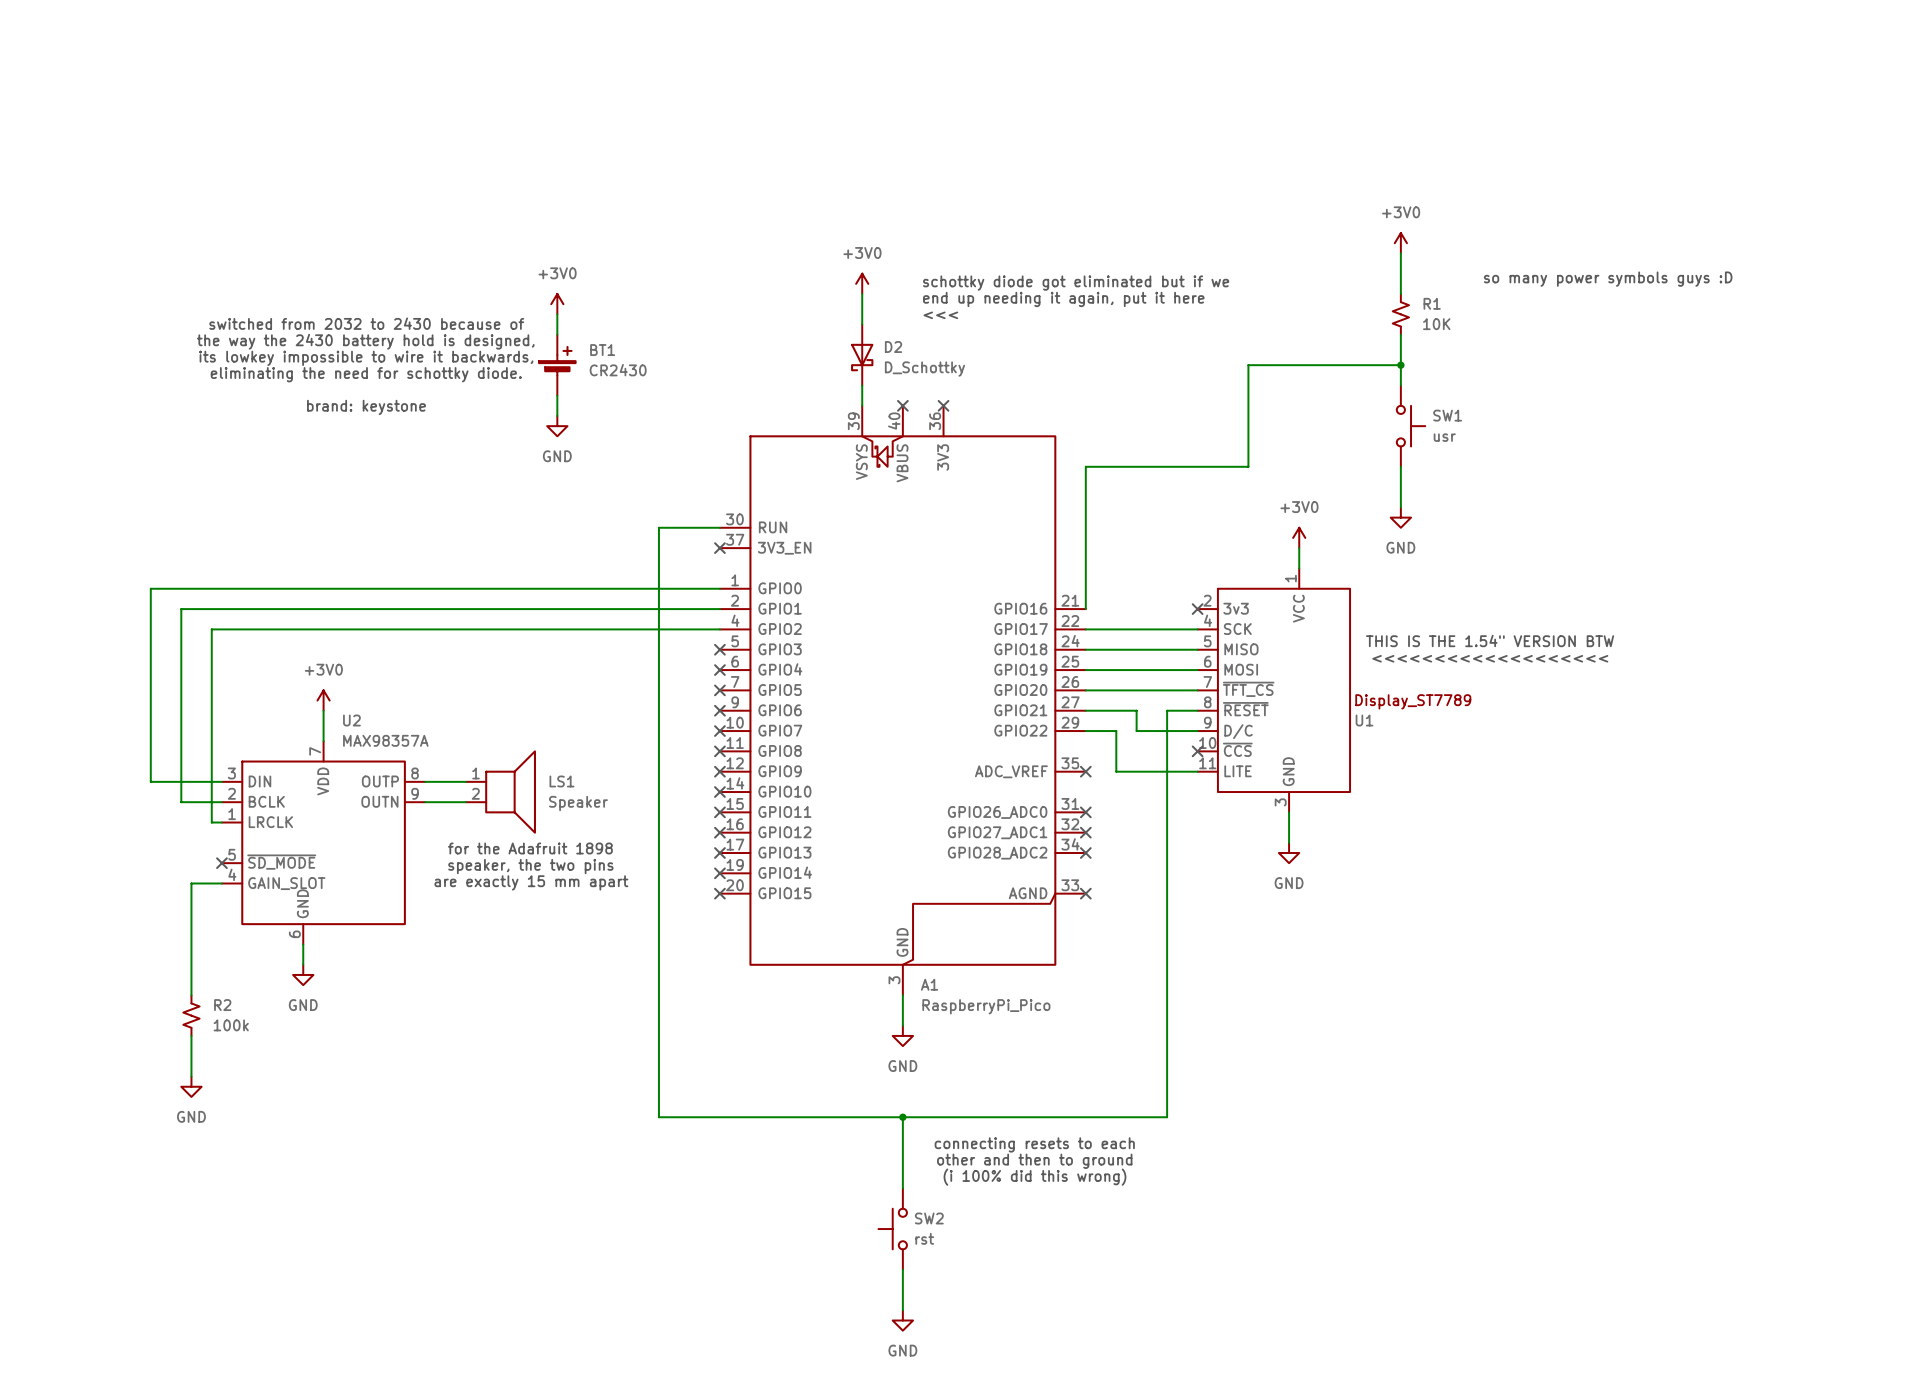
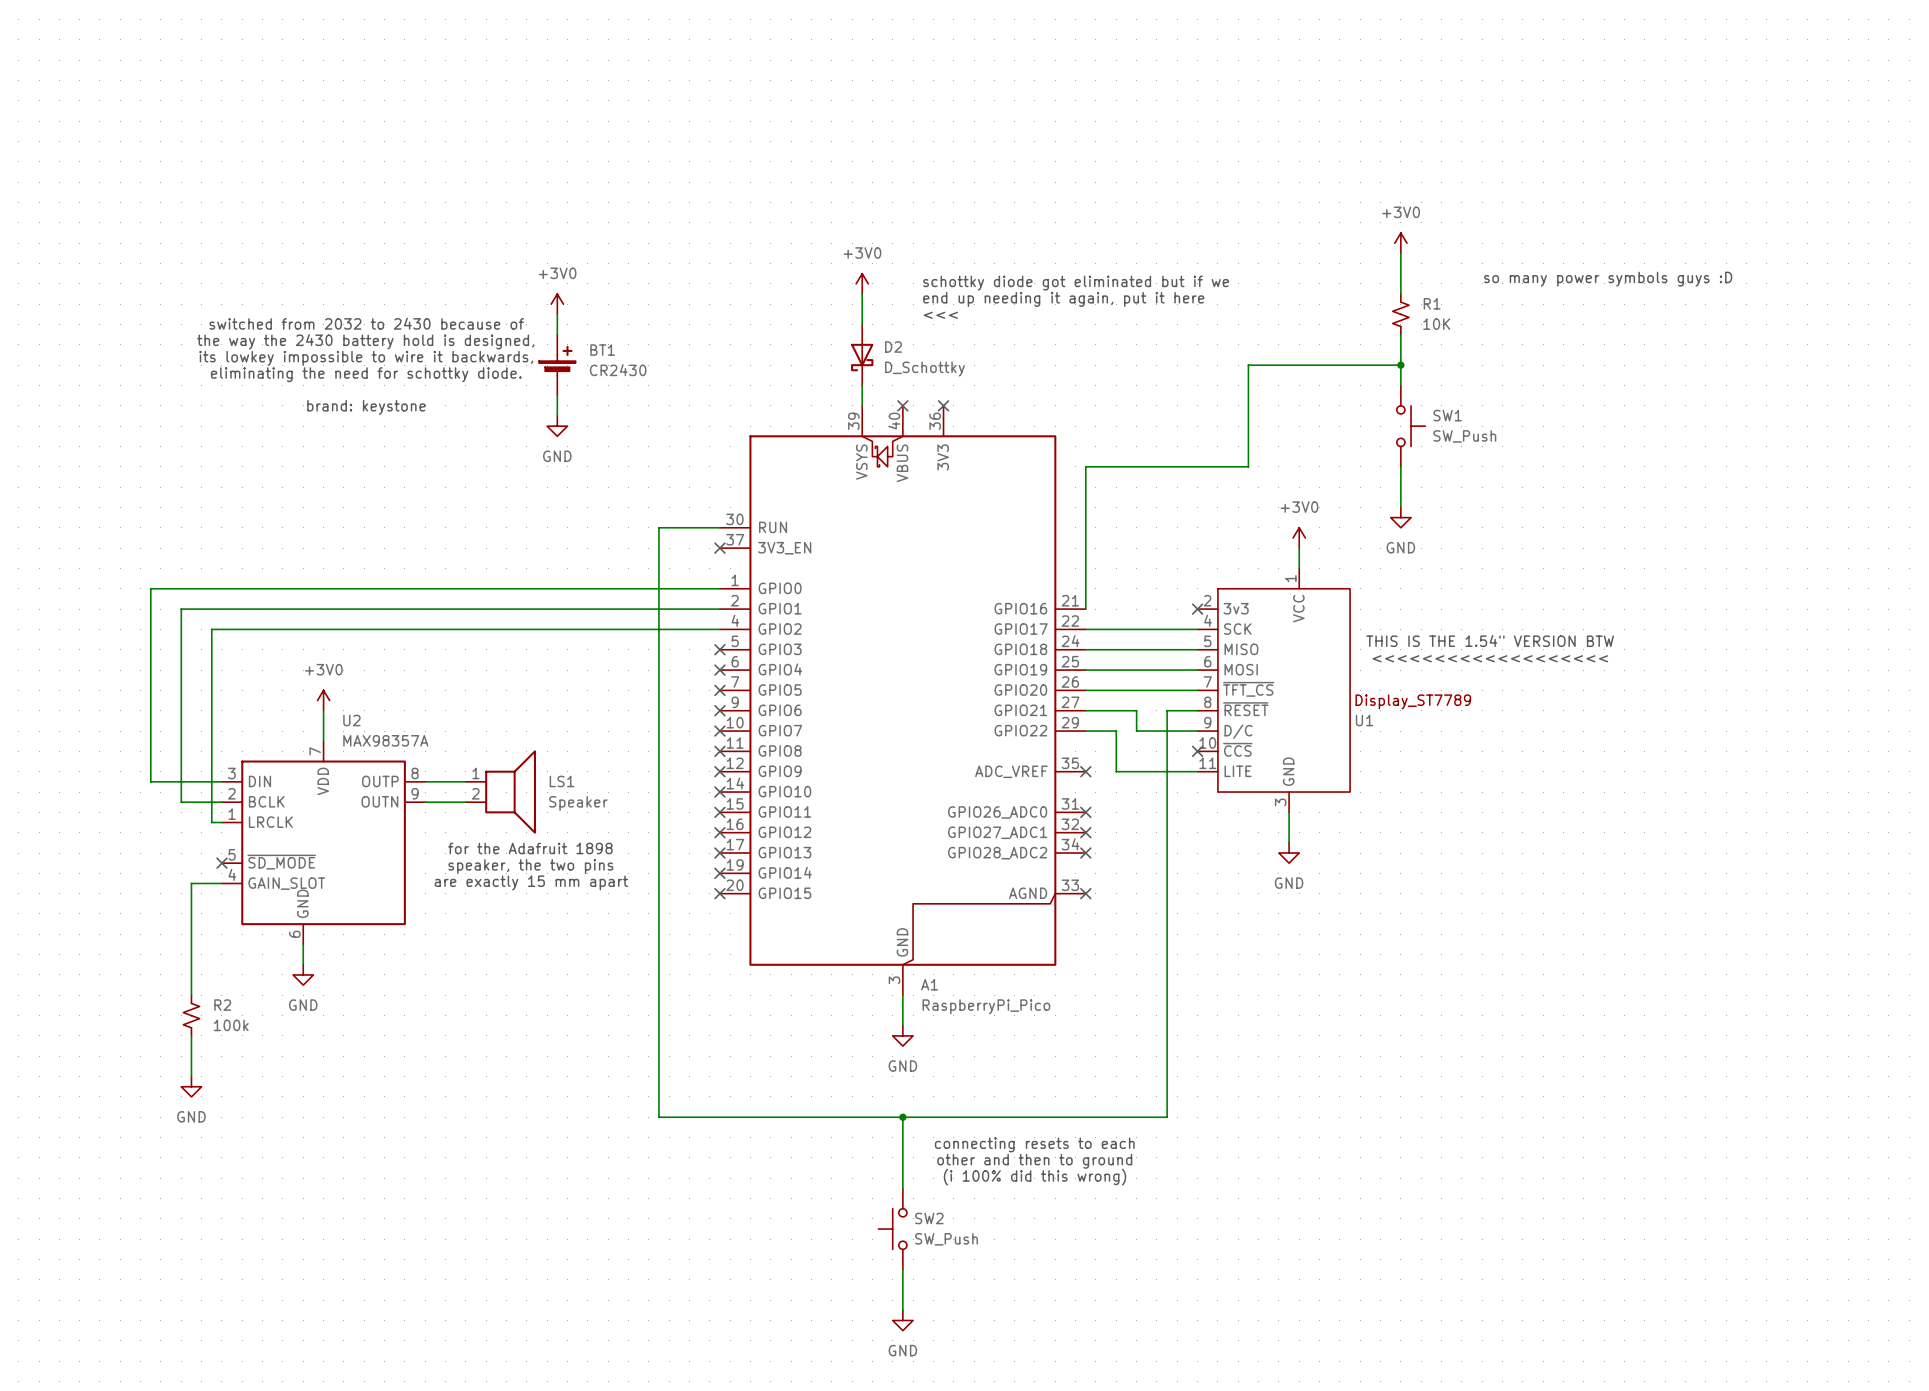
SW1 value: usr (1444, 437) -> SW_Push (1464, 436)
SW2 value: rst (924, 1238) -> SW_Push (946, 1239)

